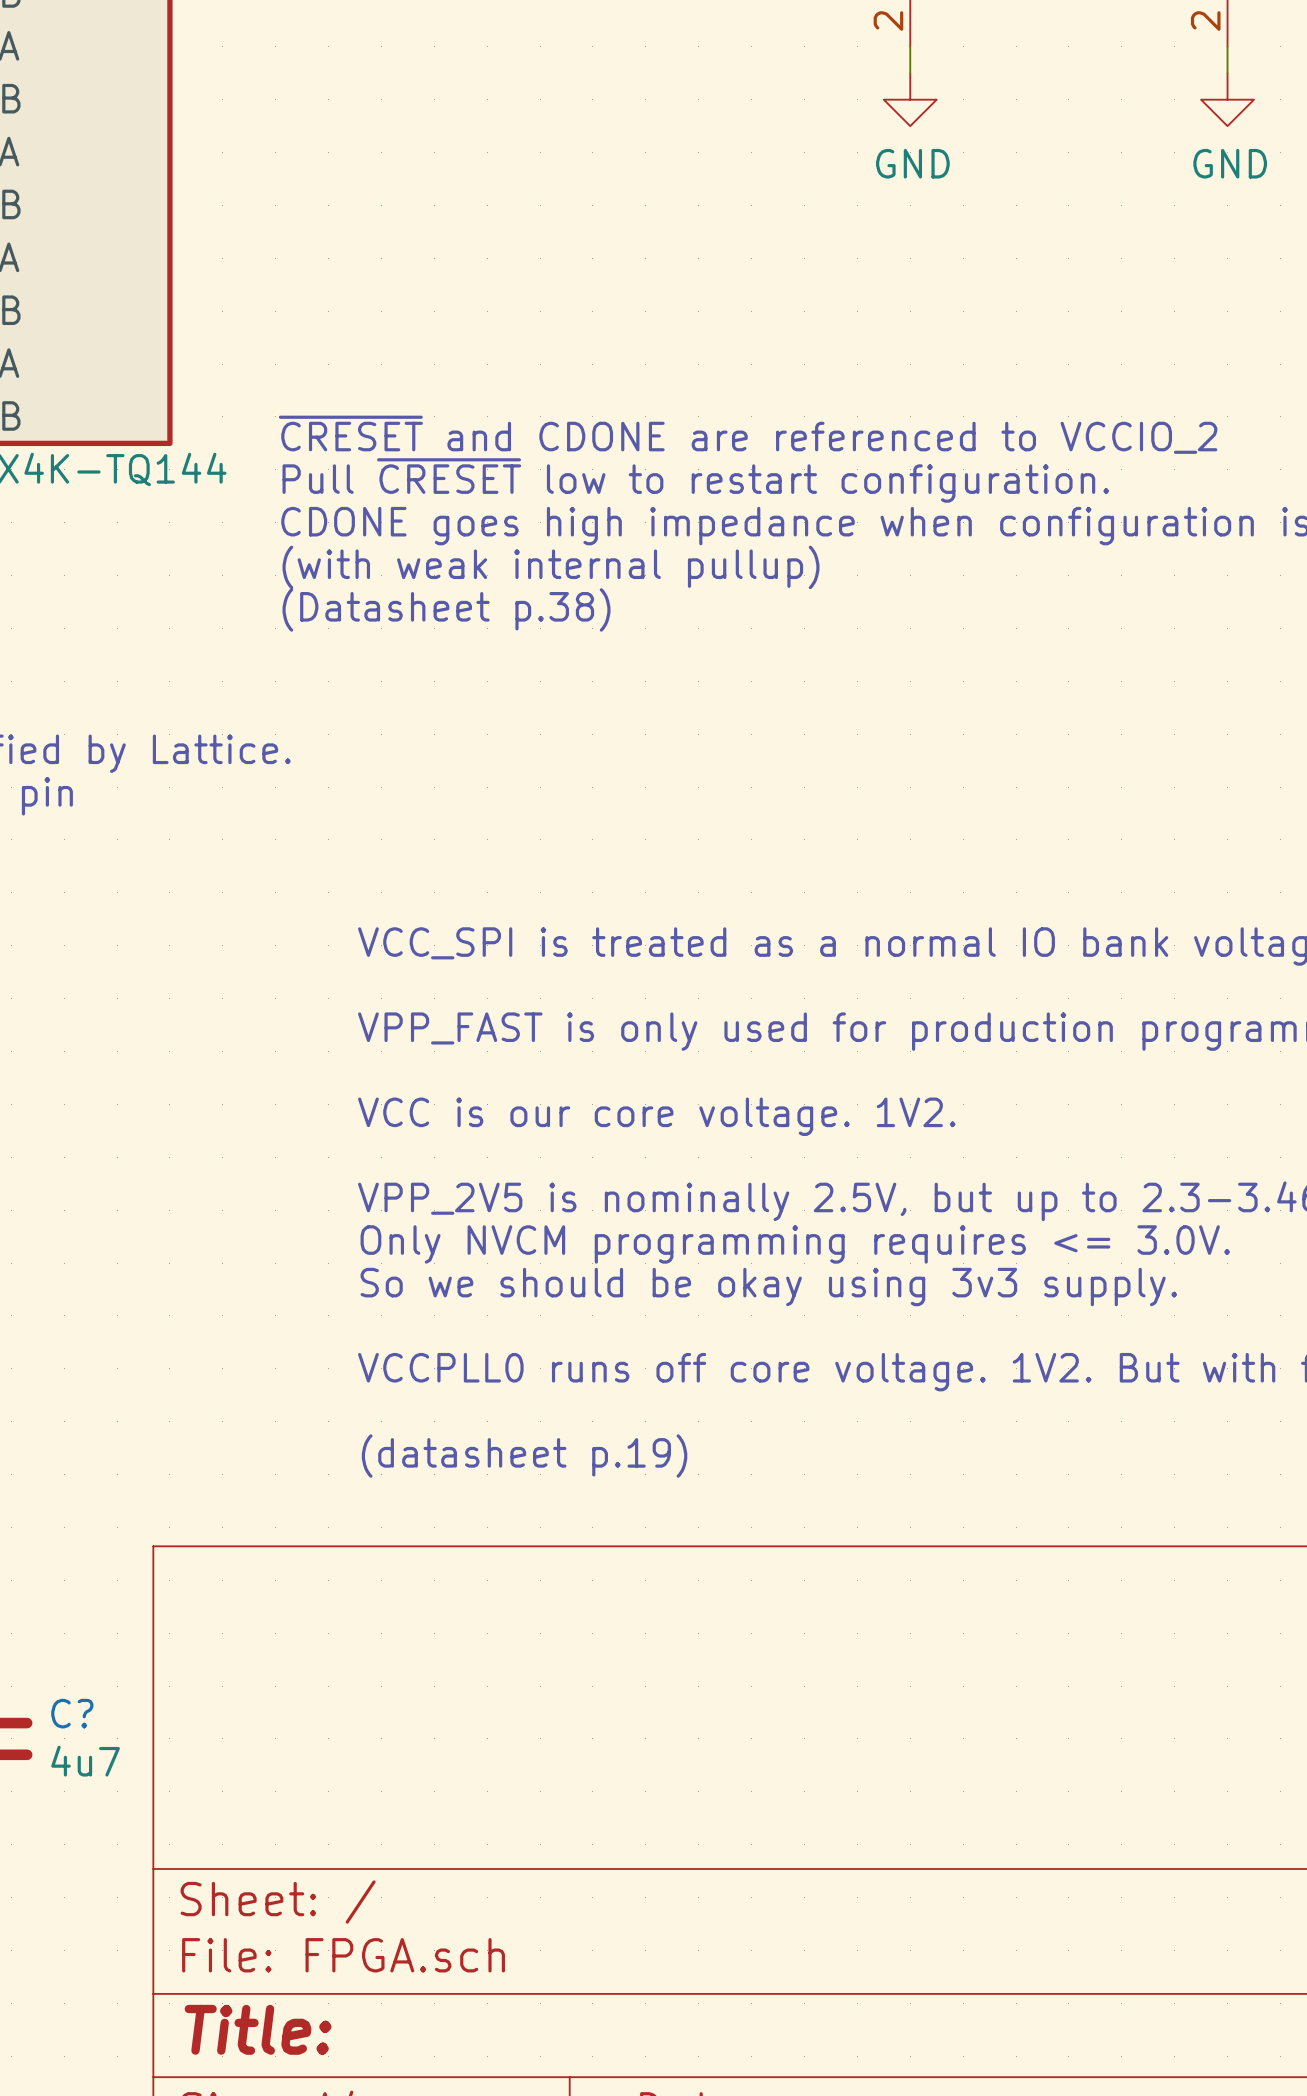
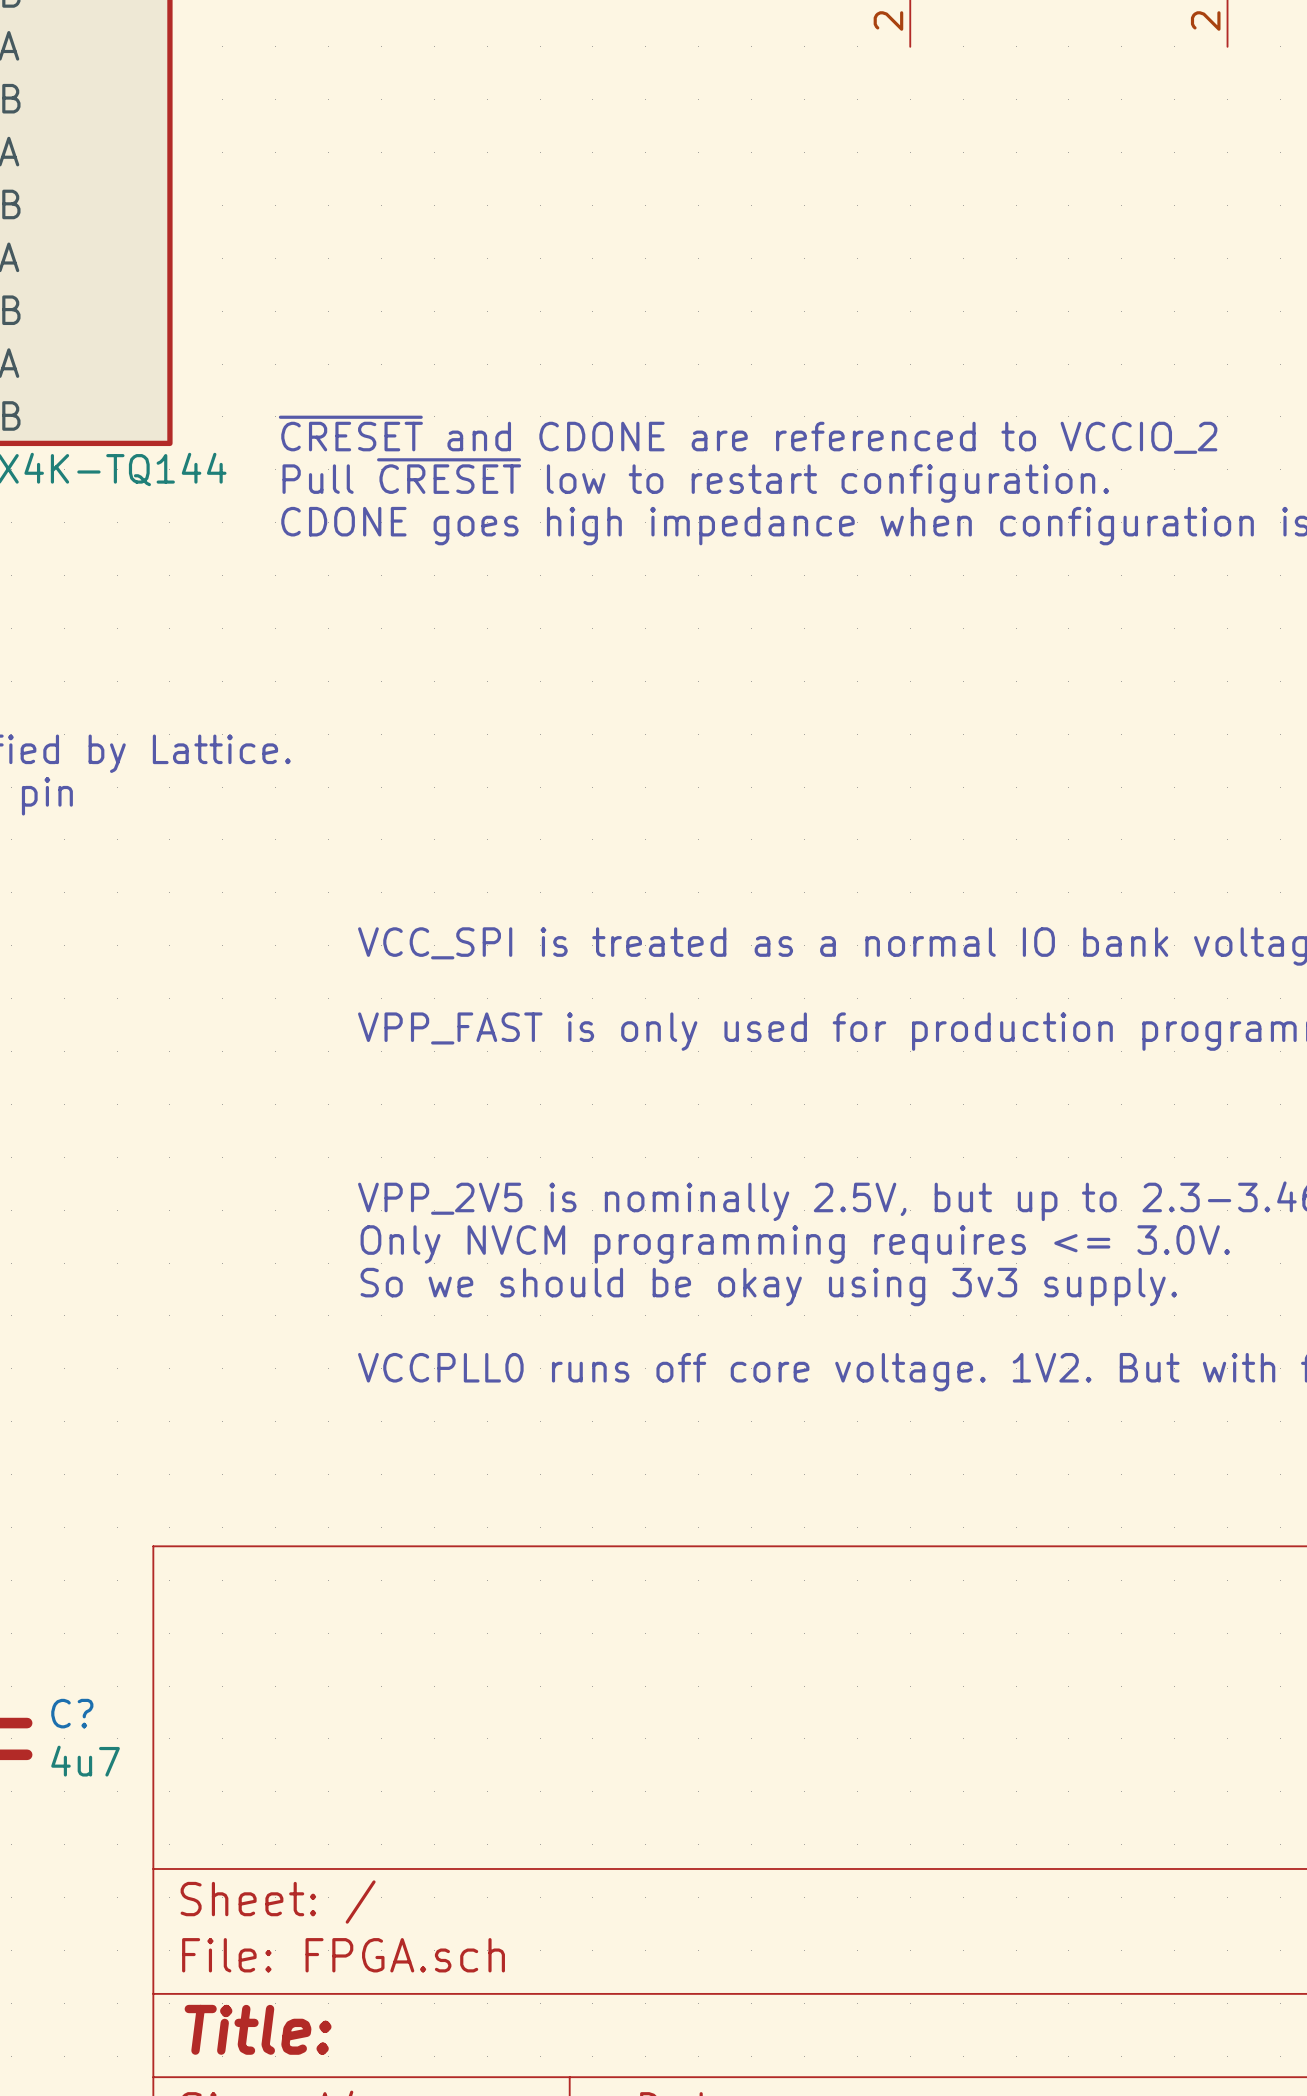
wire: (910, 46) (910, 73) -> none
wire: (1227, 46) (1227, 73) -> none
power symbol: GND (910, 99) -> none
power symbol: GND (1227, 99) -> none
text: (with weak internal pullup) (551, 567) -> none
text: (Datasheet p.38) (446, 609) -> none
text: VCC is our core voltage. 1V2. (656, 1116) -> none
text: (datasheet p.19) (524, 1456) -> none

